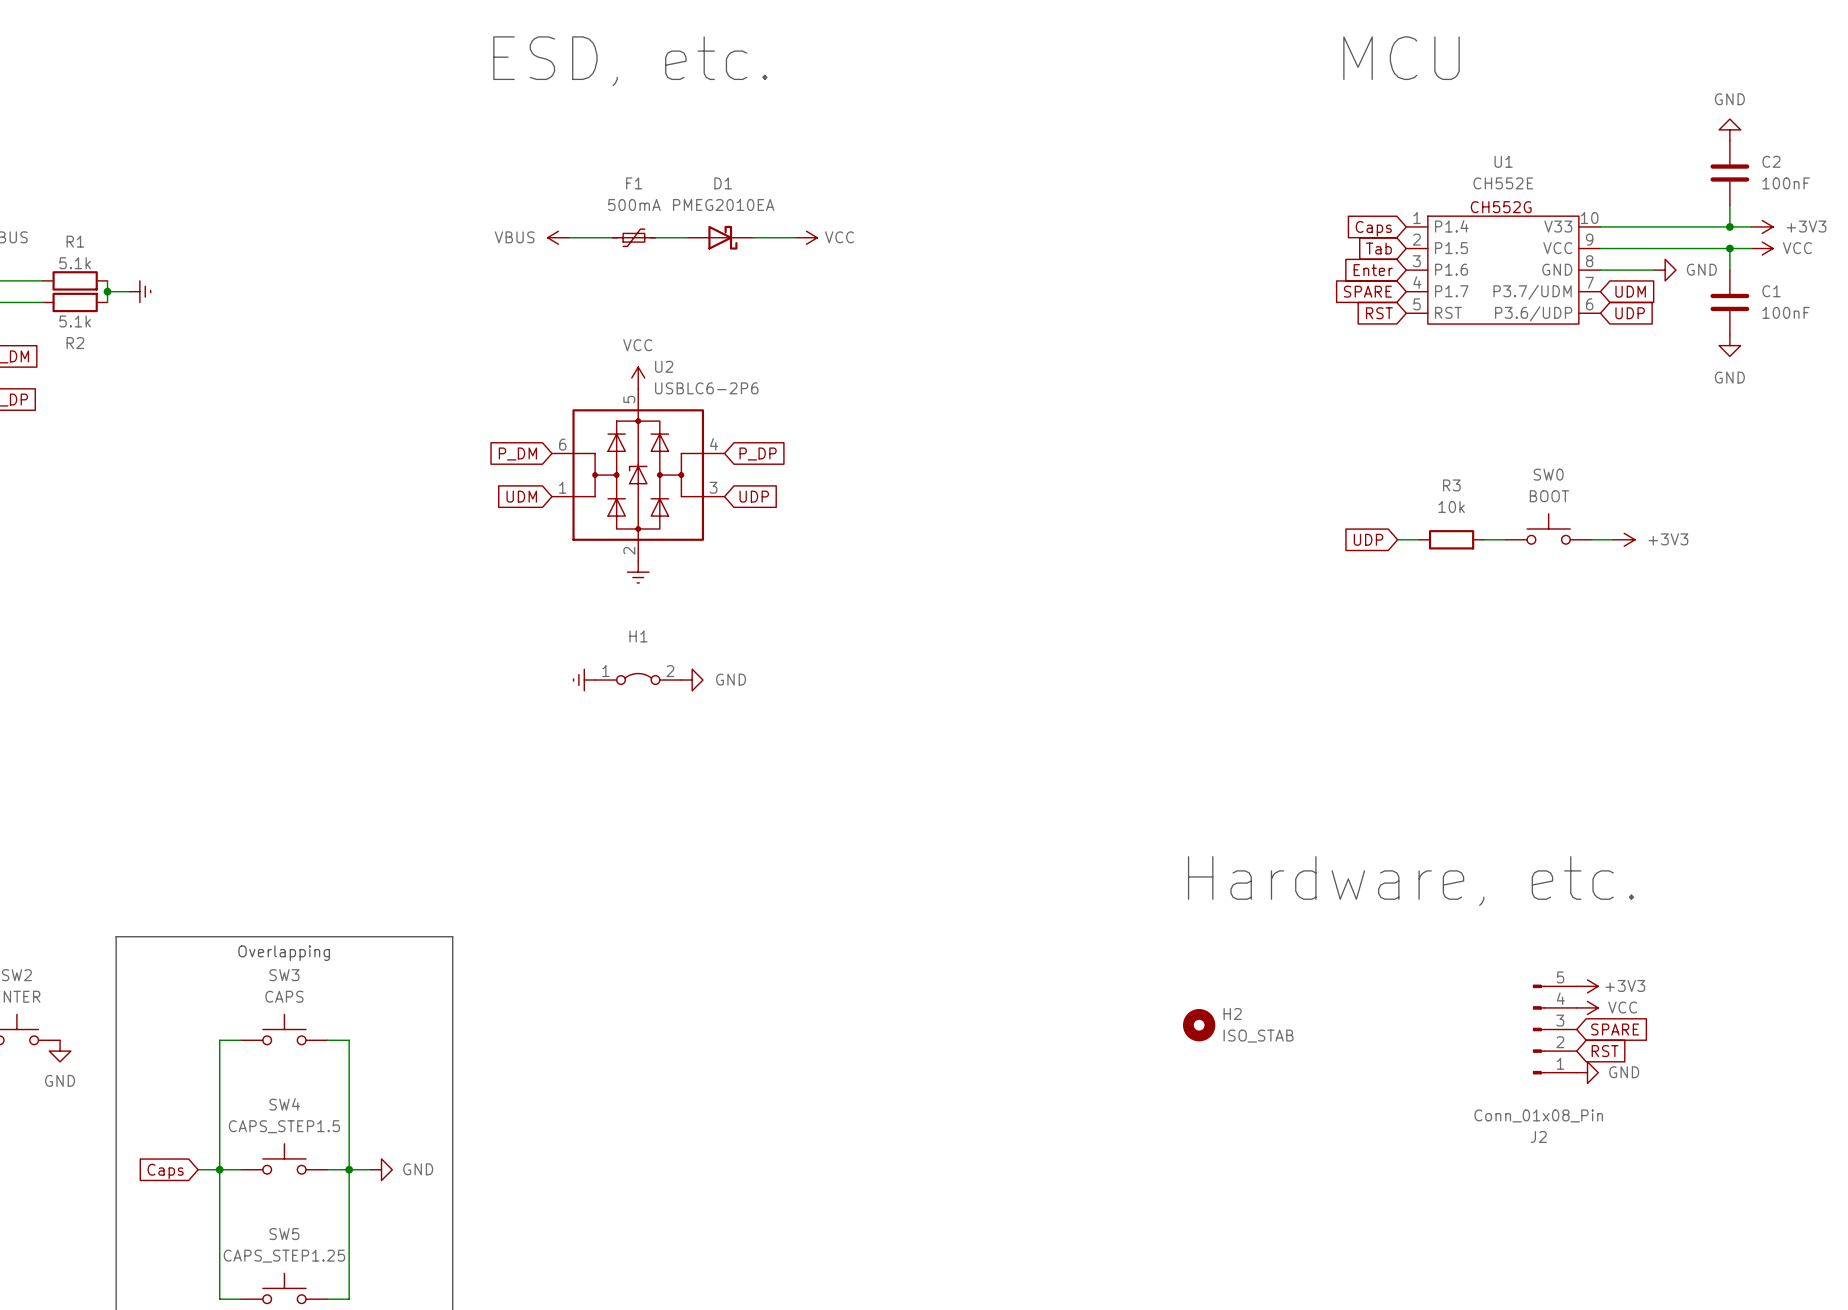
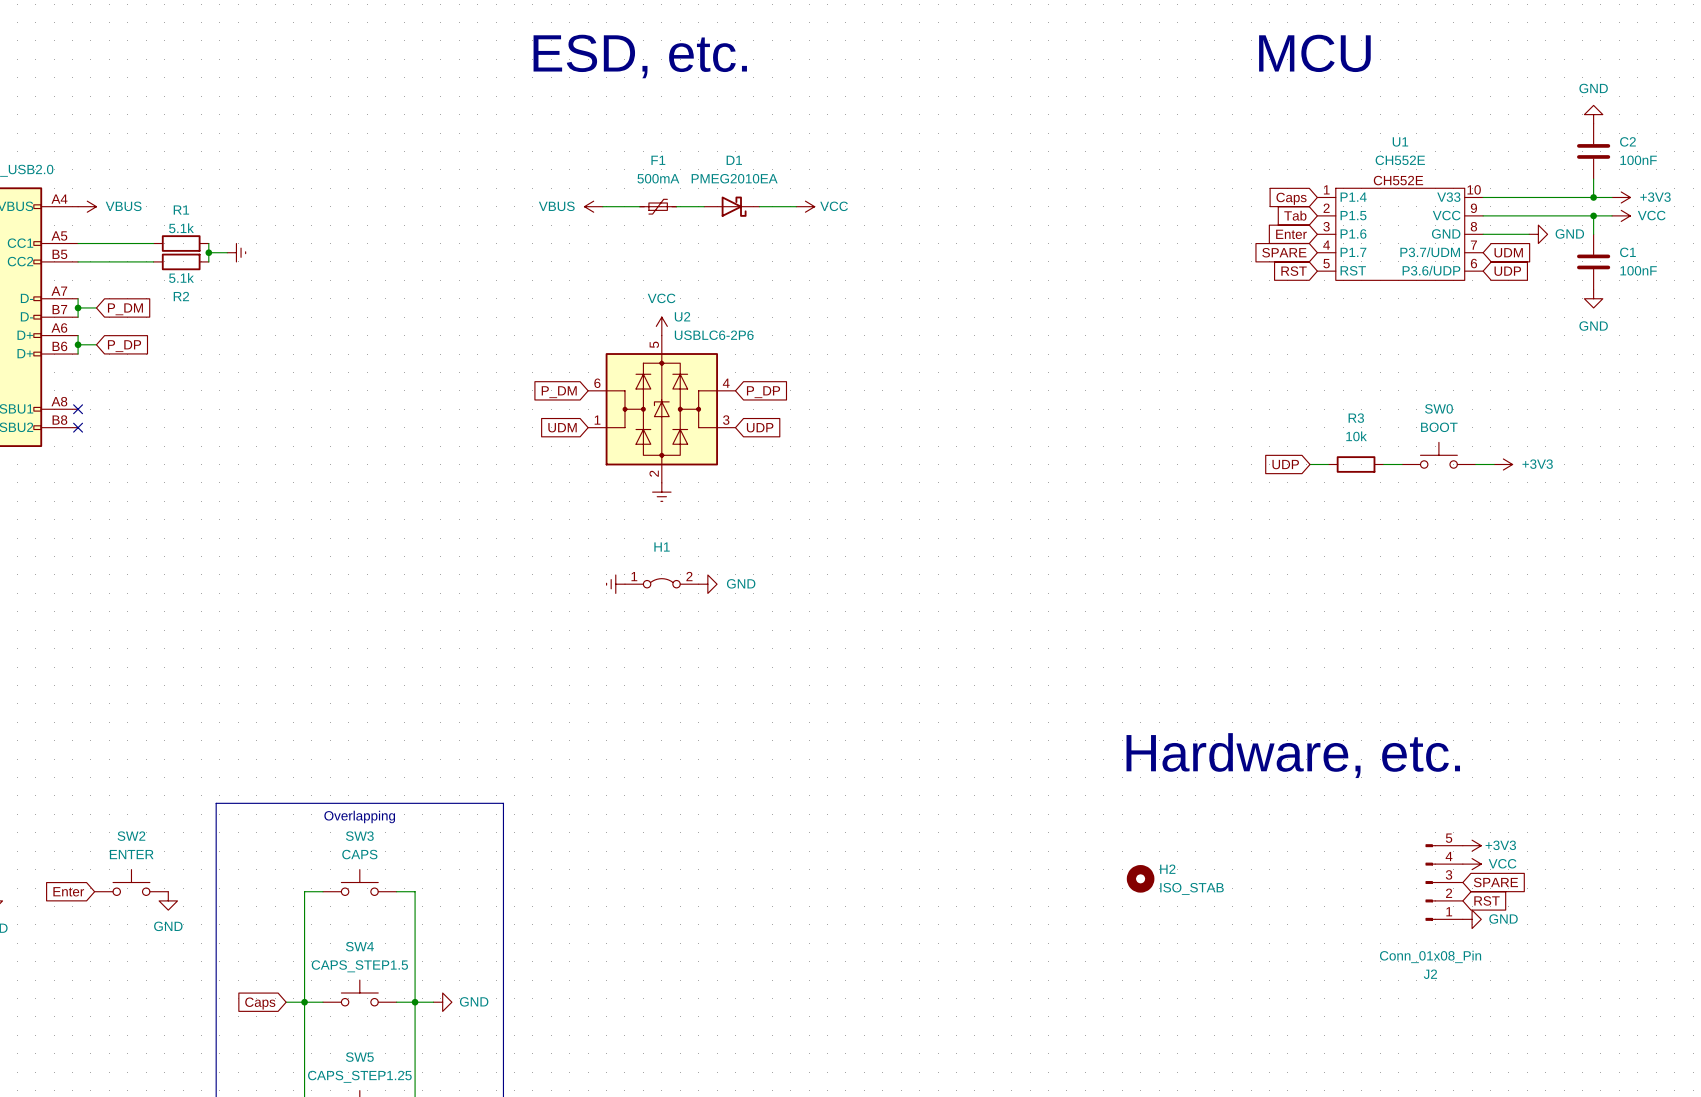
U1 text: CH552G (1501, 207) -> CH552E (1398, 180)

